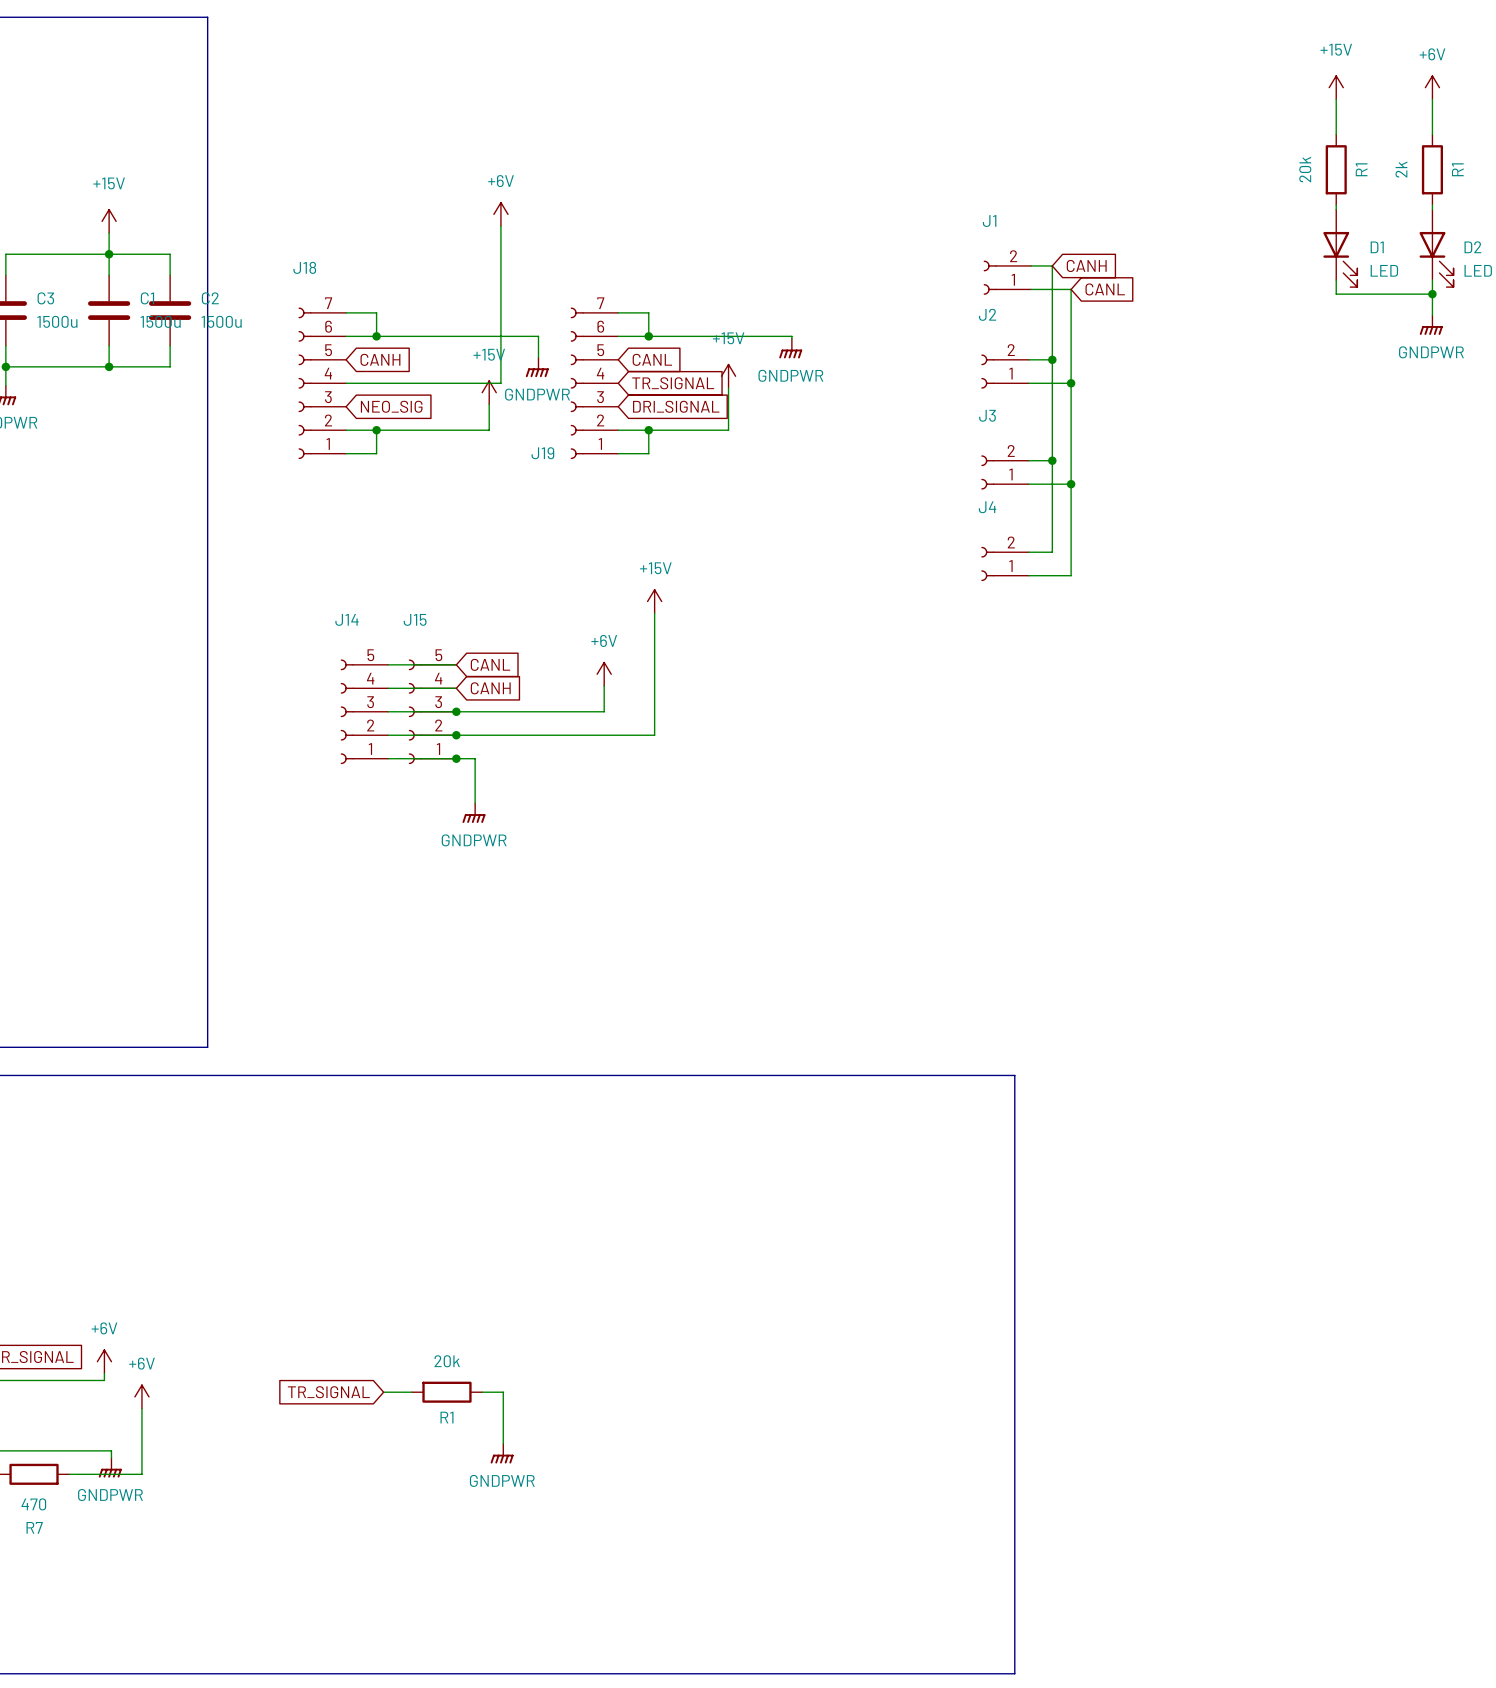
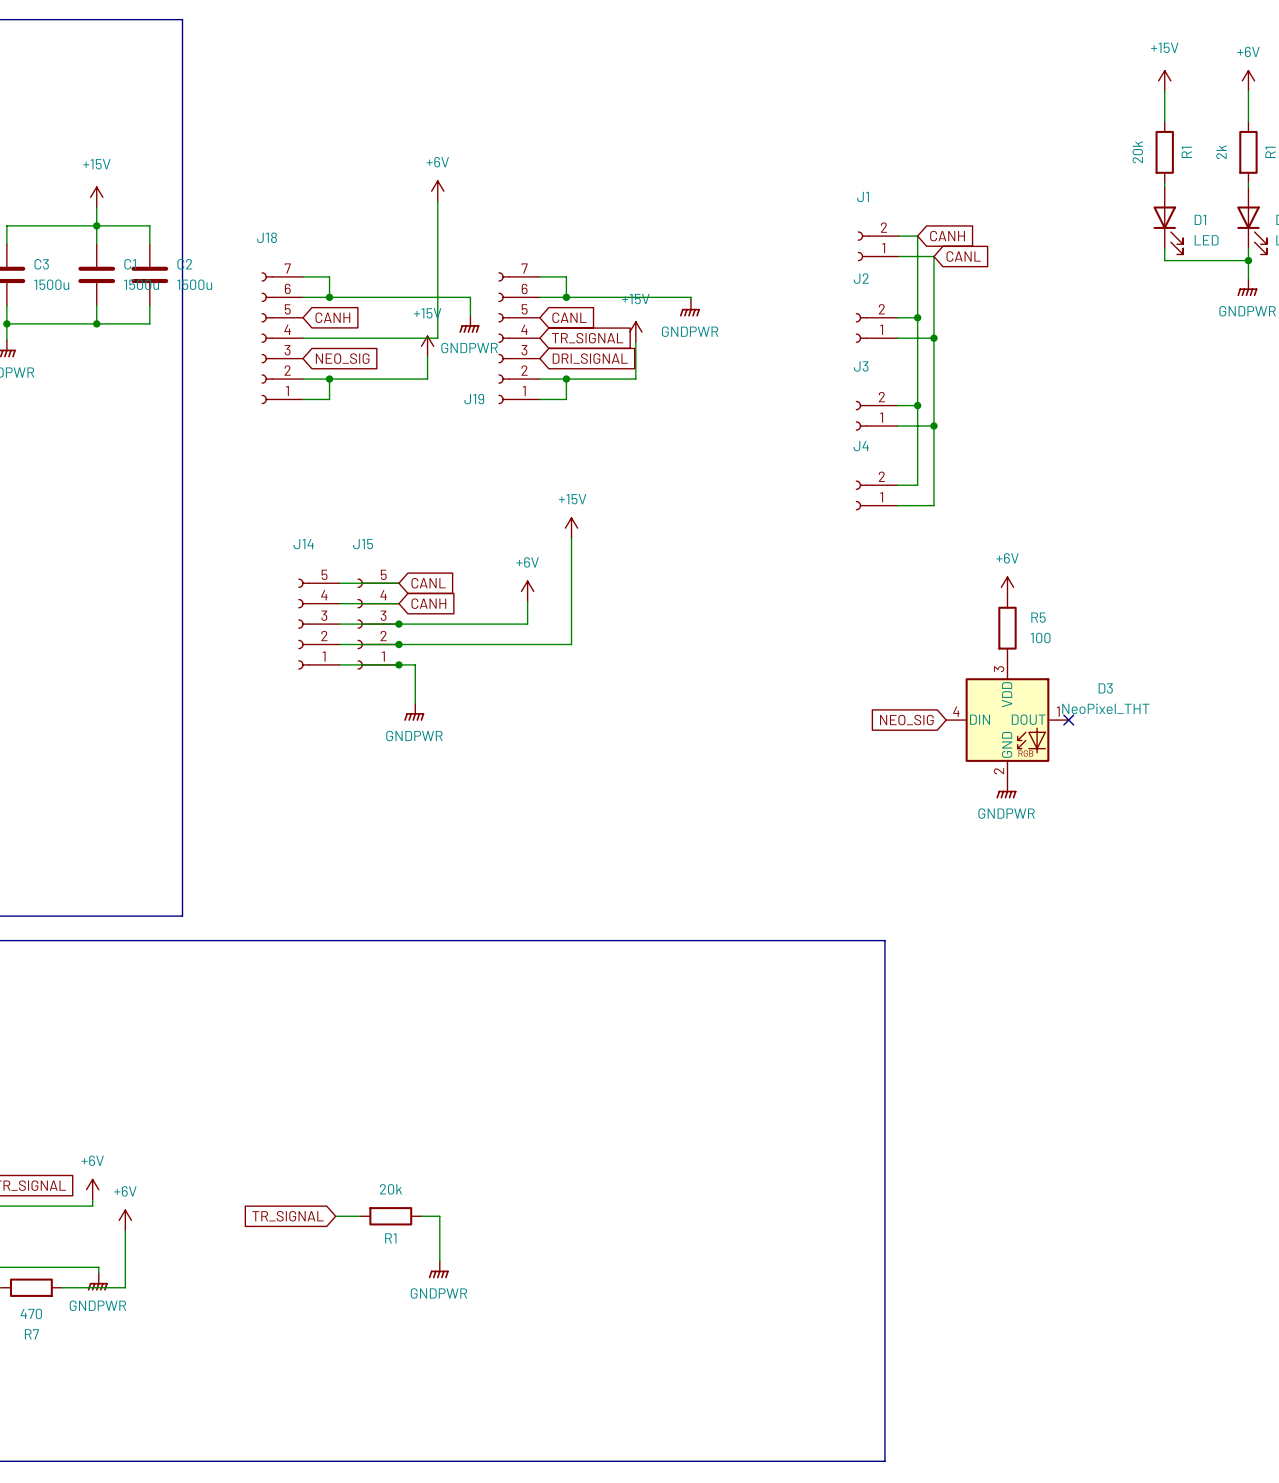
power symbol: none -> +6V (1007, 587)
R5: none -> 100 (1007, 628)
global label: none -> NEO_SIG (906, 720)
D3: none -> NeoPixel_THT (1007, 720)
no-connect mark: none -> (1068, 720)
power symbol: none -> GNDPWR (1006, 789)

